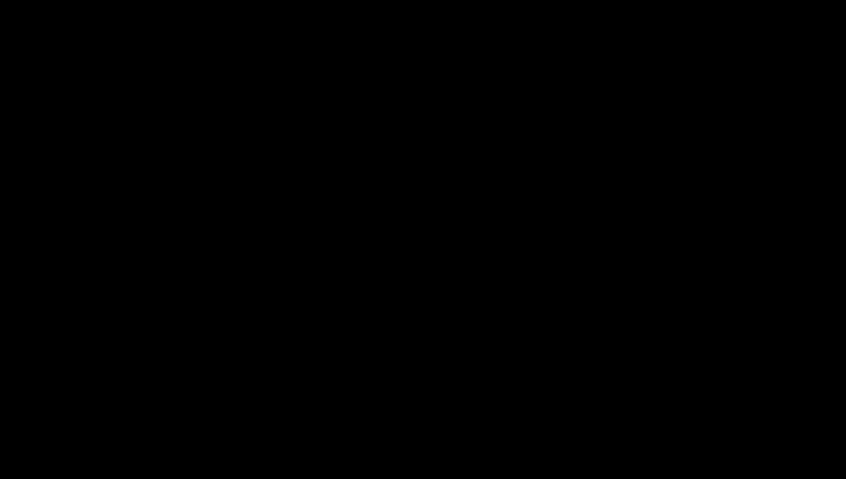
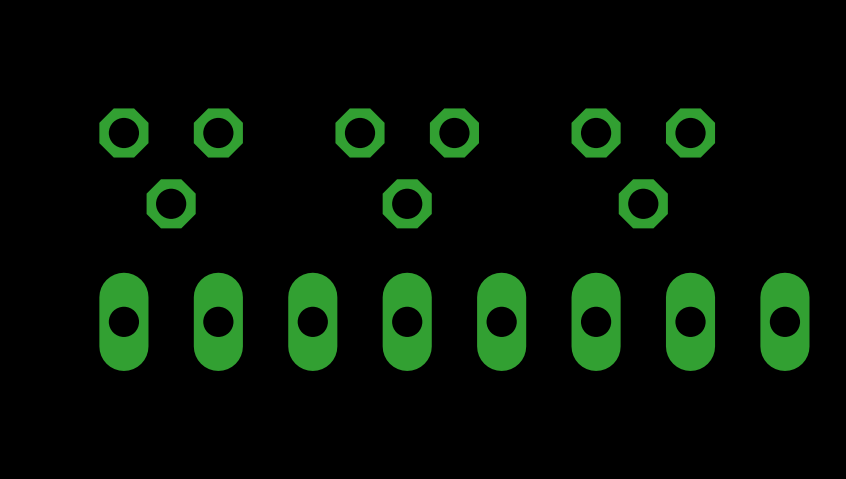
part: none -> (171, 168)
part: none -> (407, 168)
part: none -> (643, 168)
part: none -> (454, 321)

